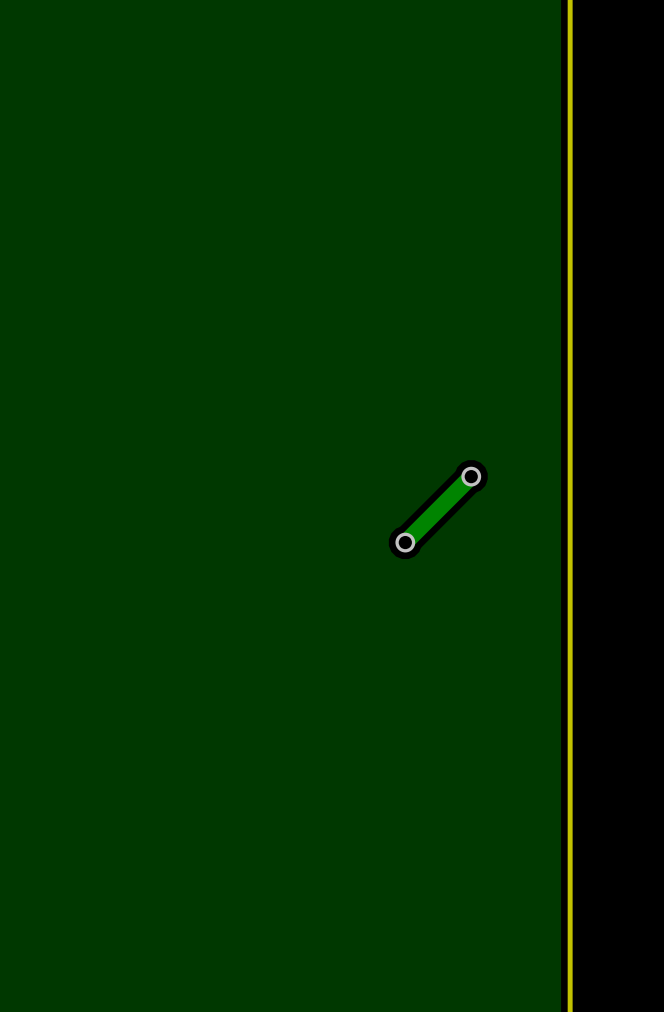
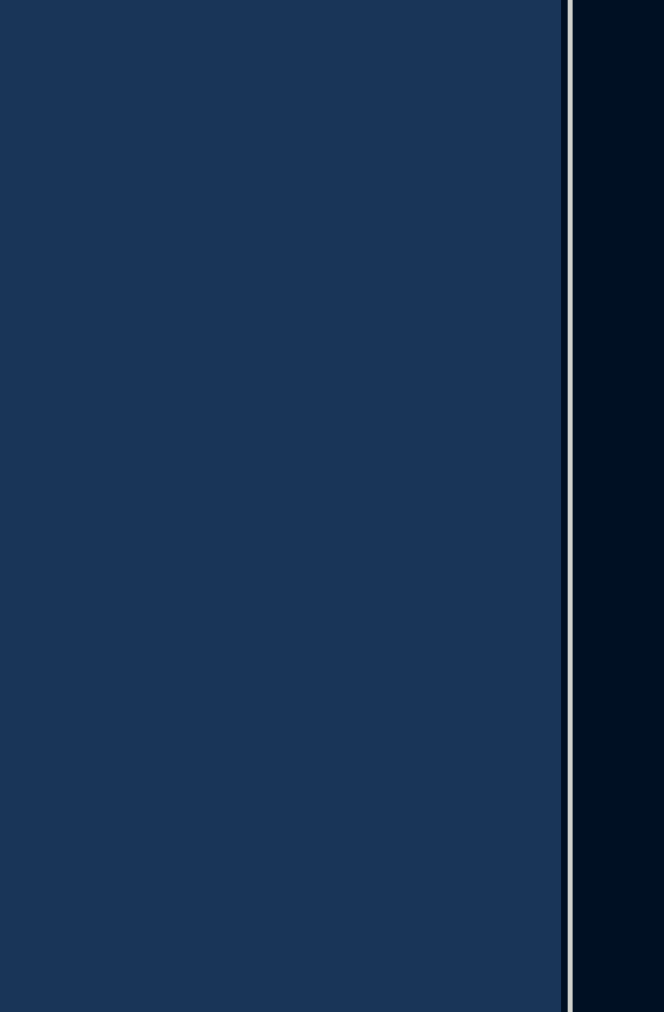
track: (471, 476) (405, 542) -> none
via: (471, 476) -> none
via: (405, 542) -> none

